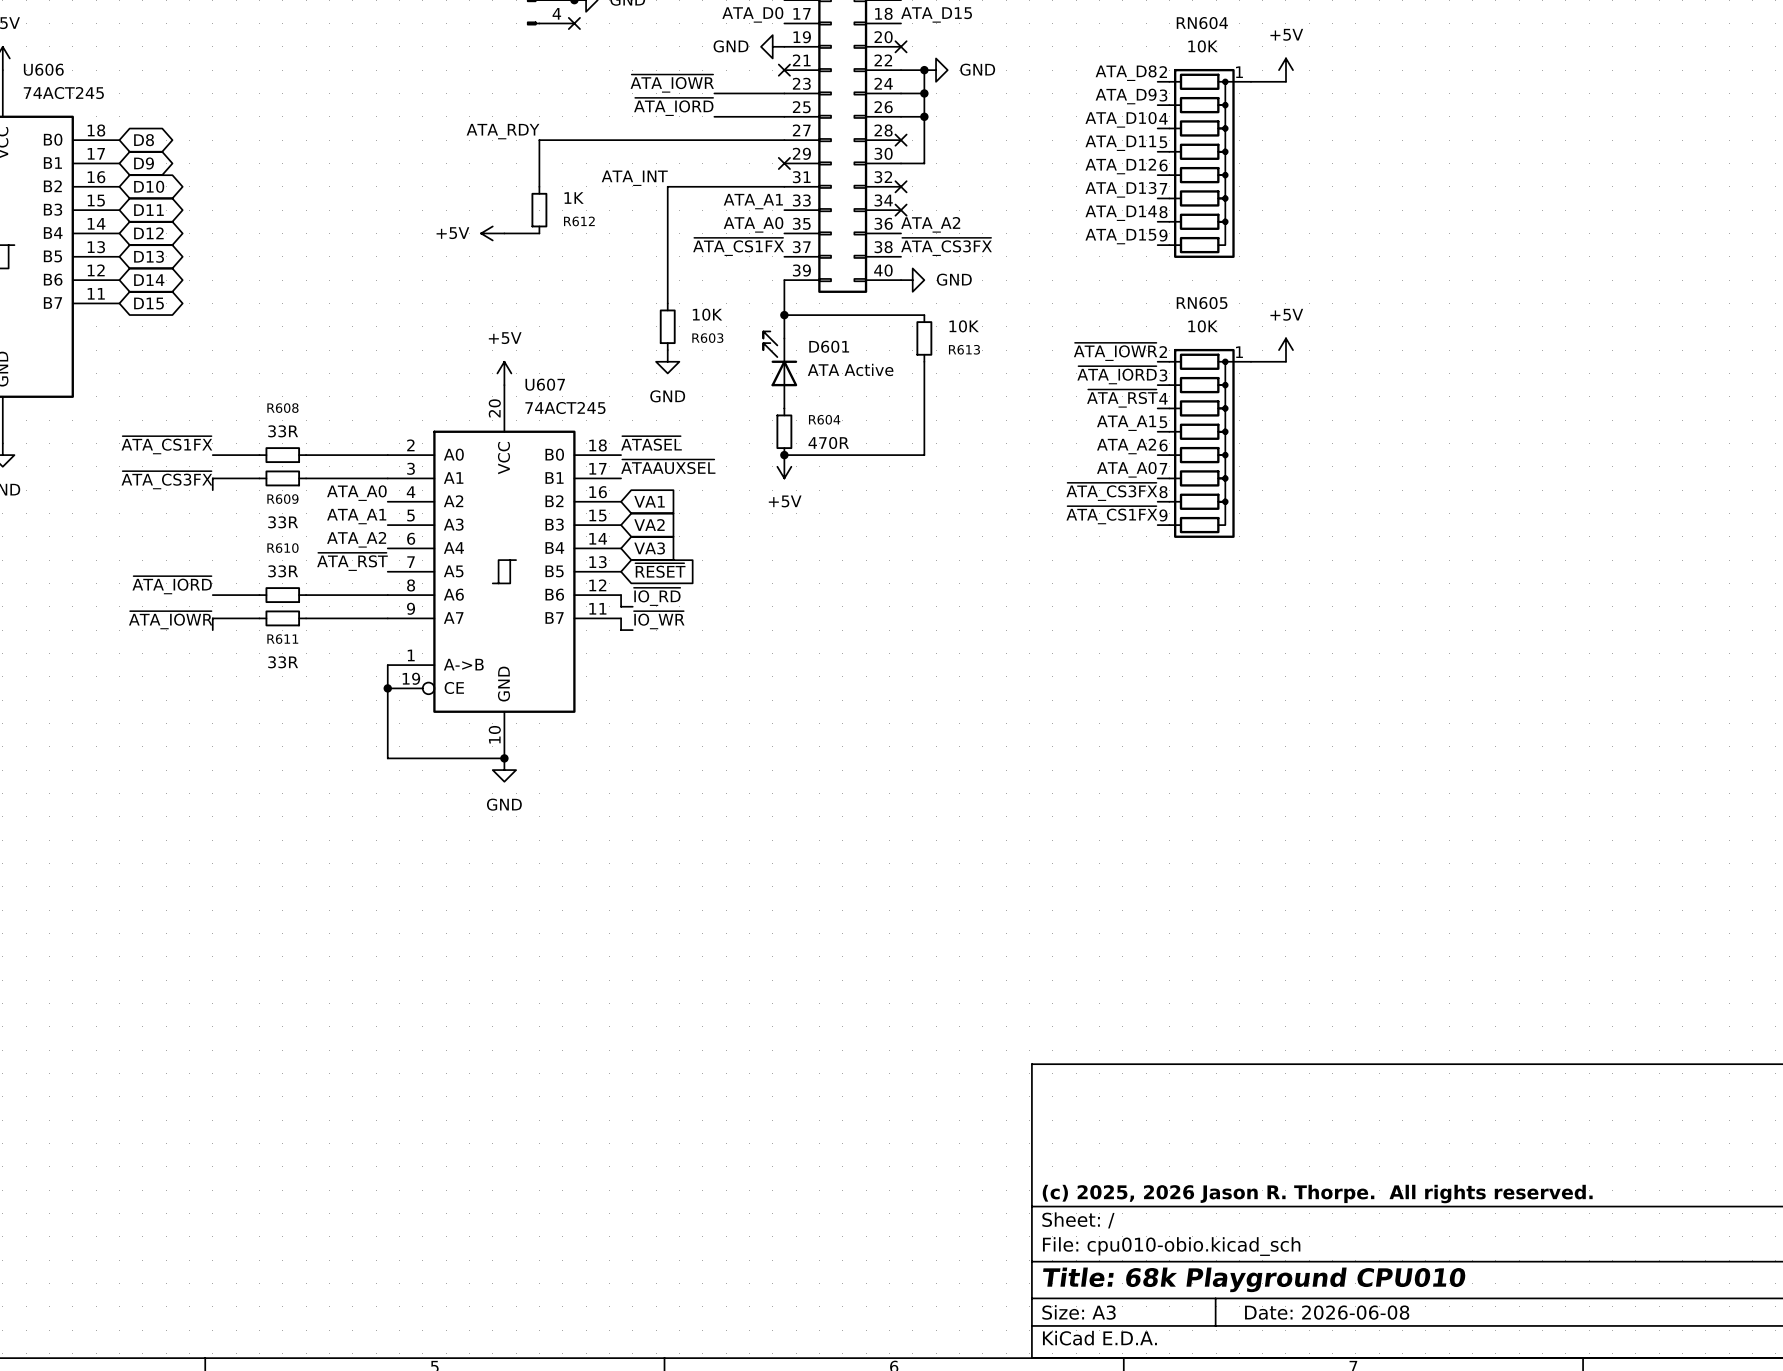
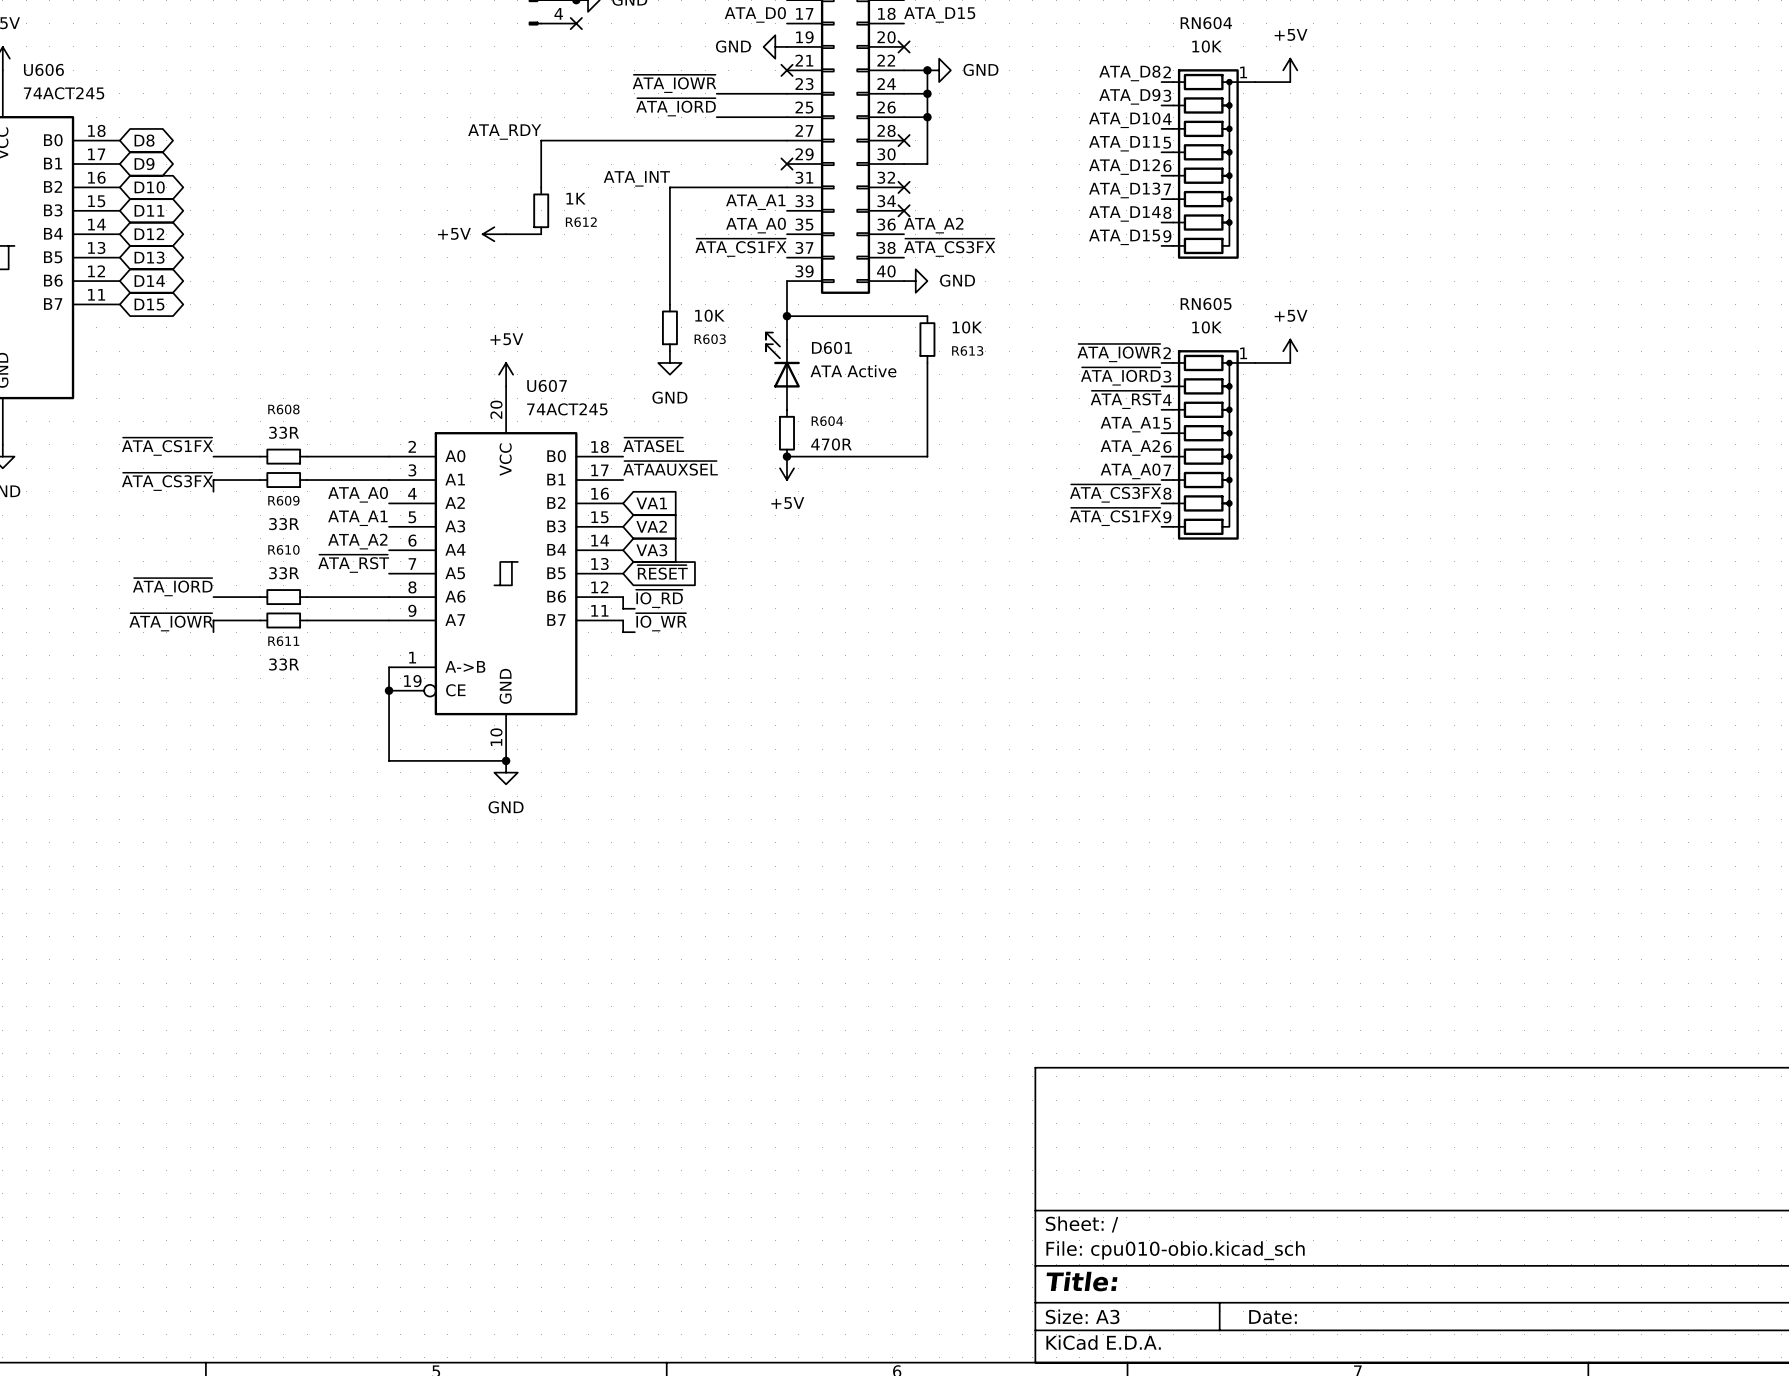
title block: (c) 2025, 2026 Jason R. Thorpe. All rights reserved. (1317, 1194) -> none
title block: Title: 68k Playground CPU010 (1254, 1279) -> Title: (1081, 1281)
title block: Date: 2026-06-08 (1327, 1312) -> Date: (1273, 1317)

